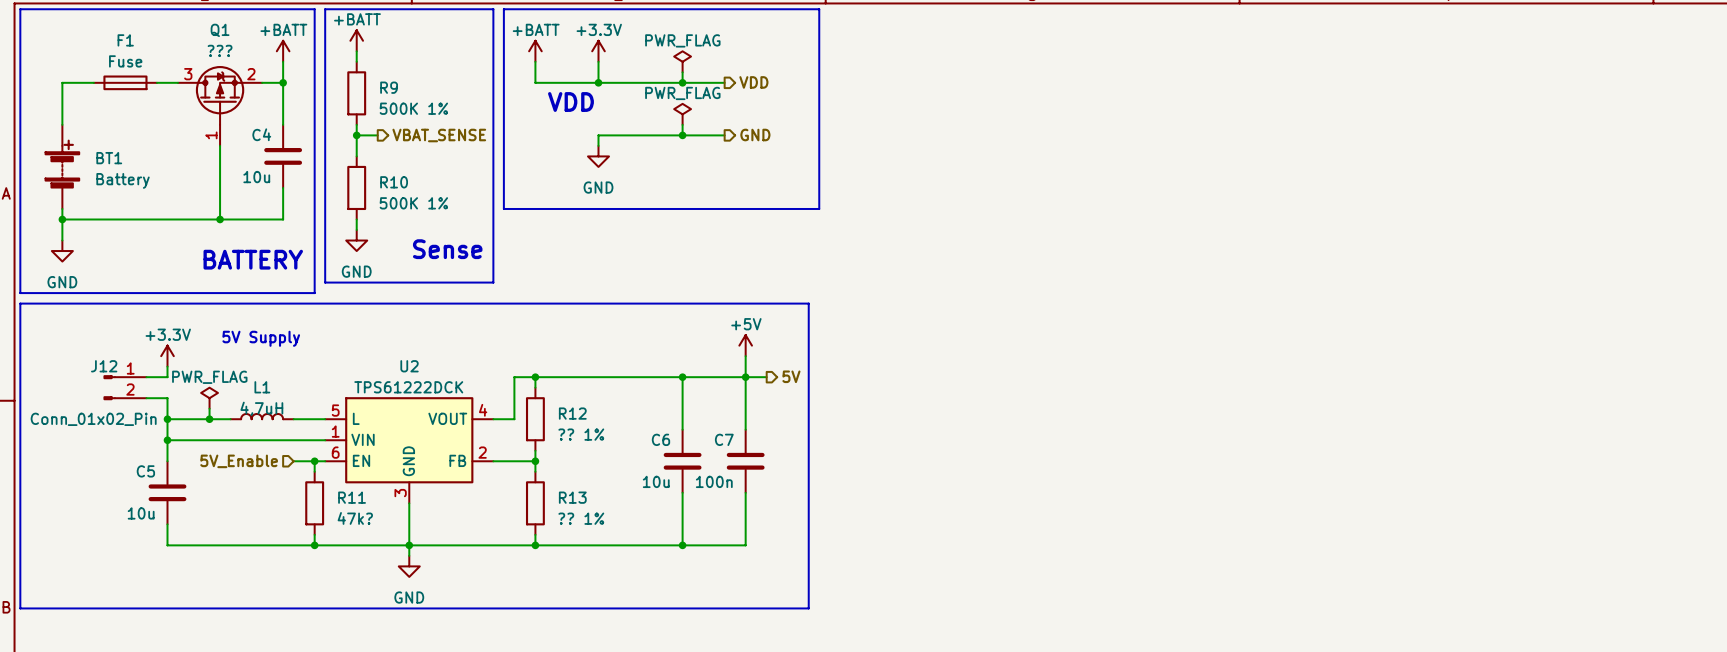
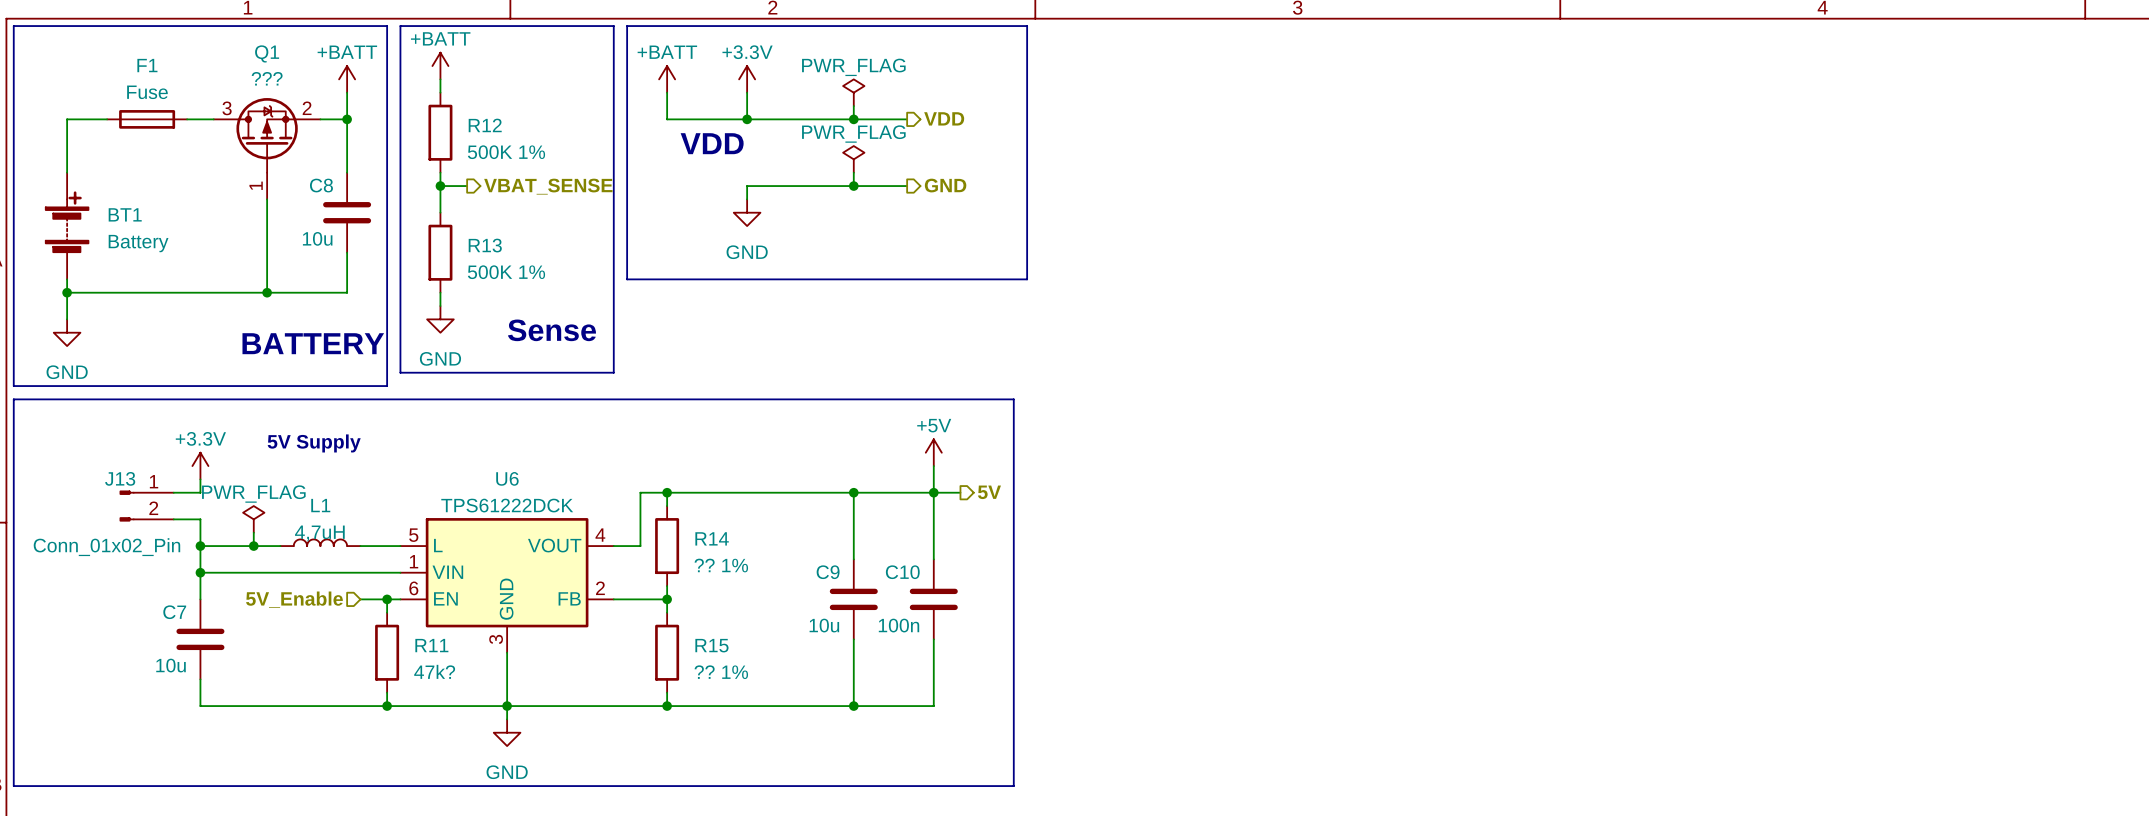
R9 name: R9 (389, 87) -> R12 (485, 125)
C4 name: C4 (261, 134) -> C8 (321, 185)
R10 name: R10 (394, 182) -> R13 (485, 245)
J12 name: J12 (104, 366) -> J13 (120, 478)
U2 name: U2 (409, 366) -> U6 (507, 478)
R12 name: R12 (572, 413) -> R14 (712, 538)
C6 name: C6 (660, 439) -> C9 (828, 572)
C7 name: C7 (724, 439) -> C10 (902, 572)
C5 name: C5 (145, 471) -> C7 (174, 612)
R13 name: R13 (572, 497) -> R15 (711, 645)

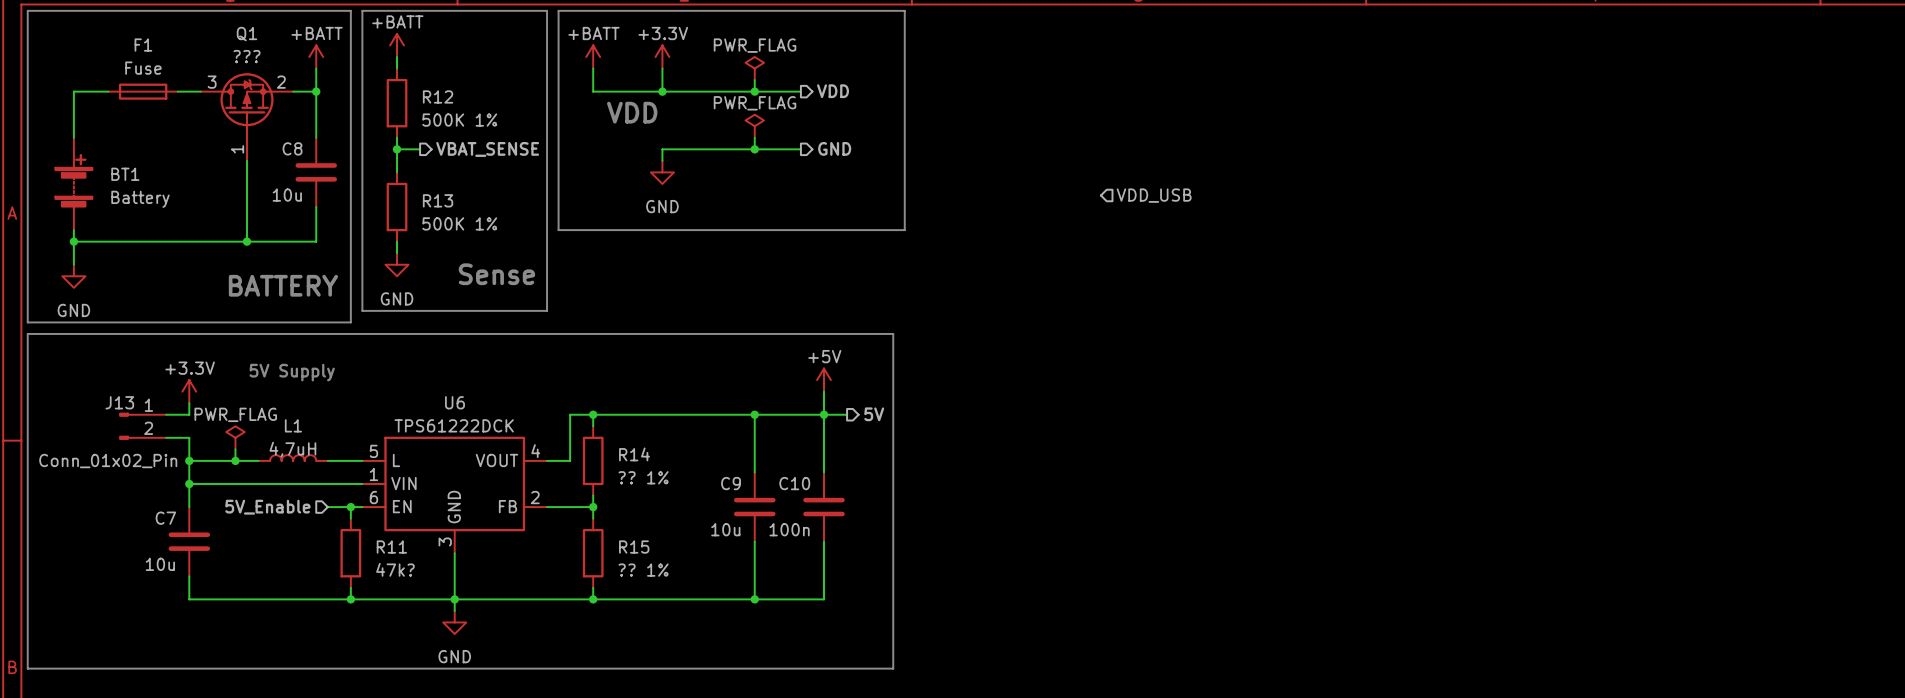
hierarchical label: none -> VDD_USB (1154, 195)

